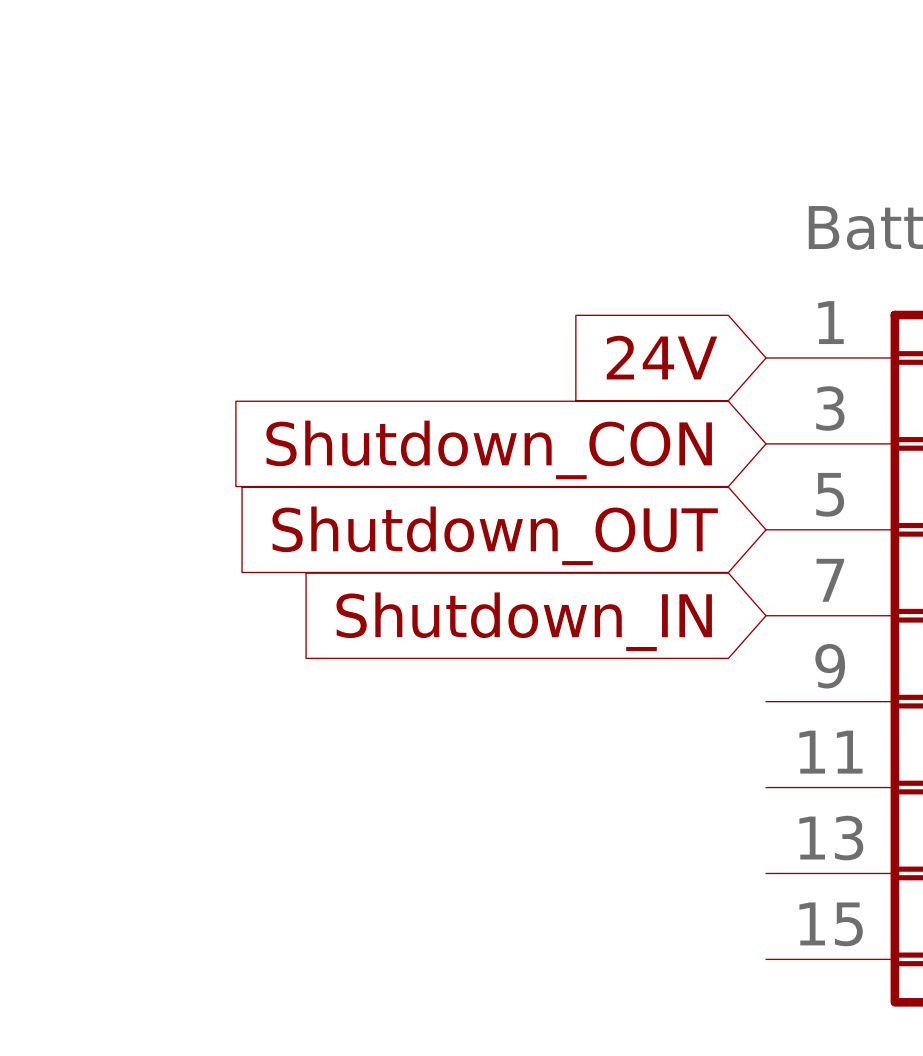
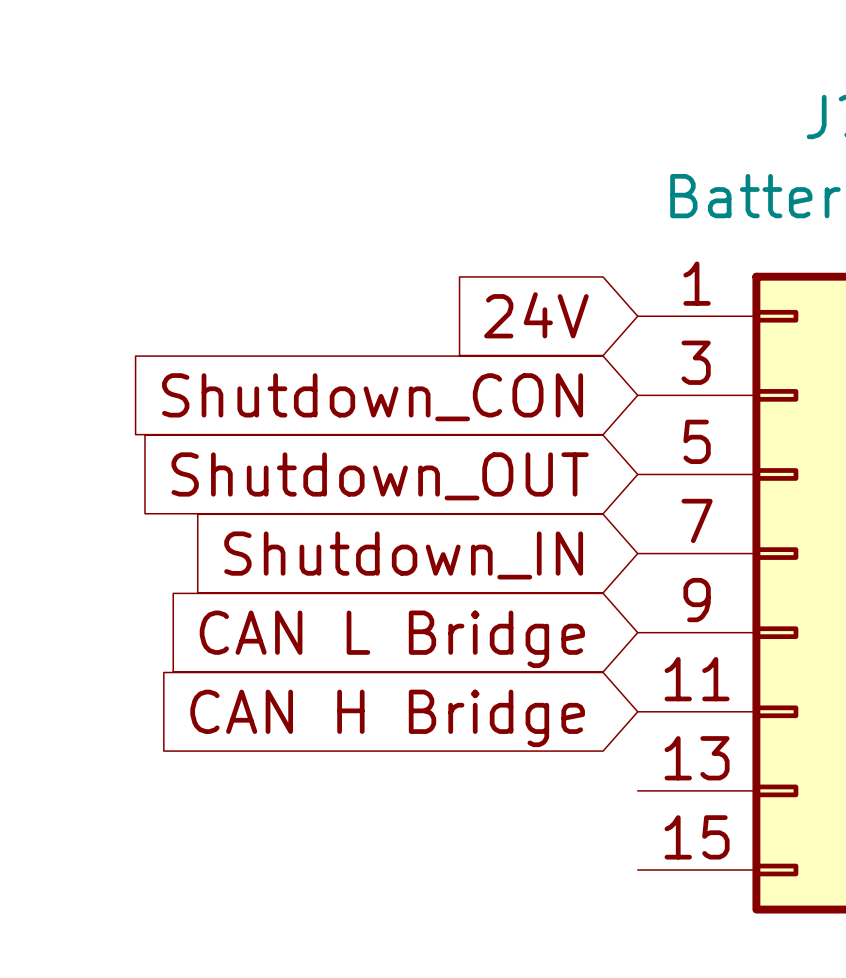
global label: none -> CAN L Bridge (392, 639)
global label: none -> CAN H Bridge (387, 718)

